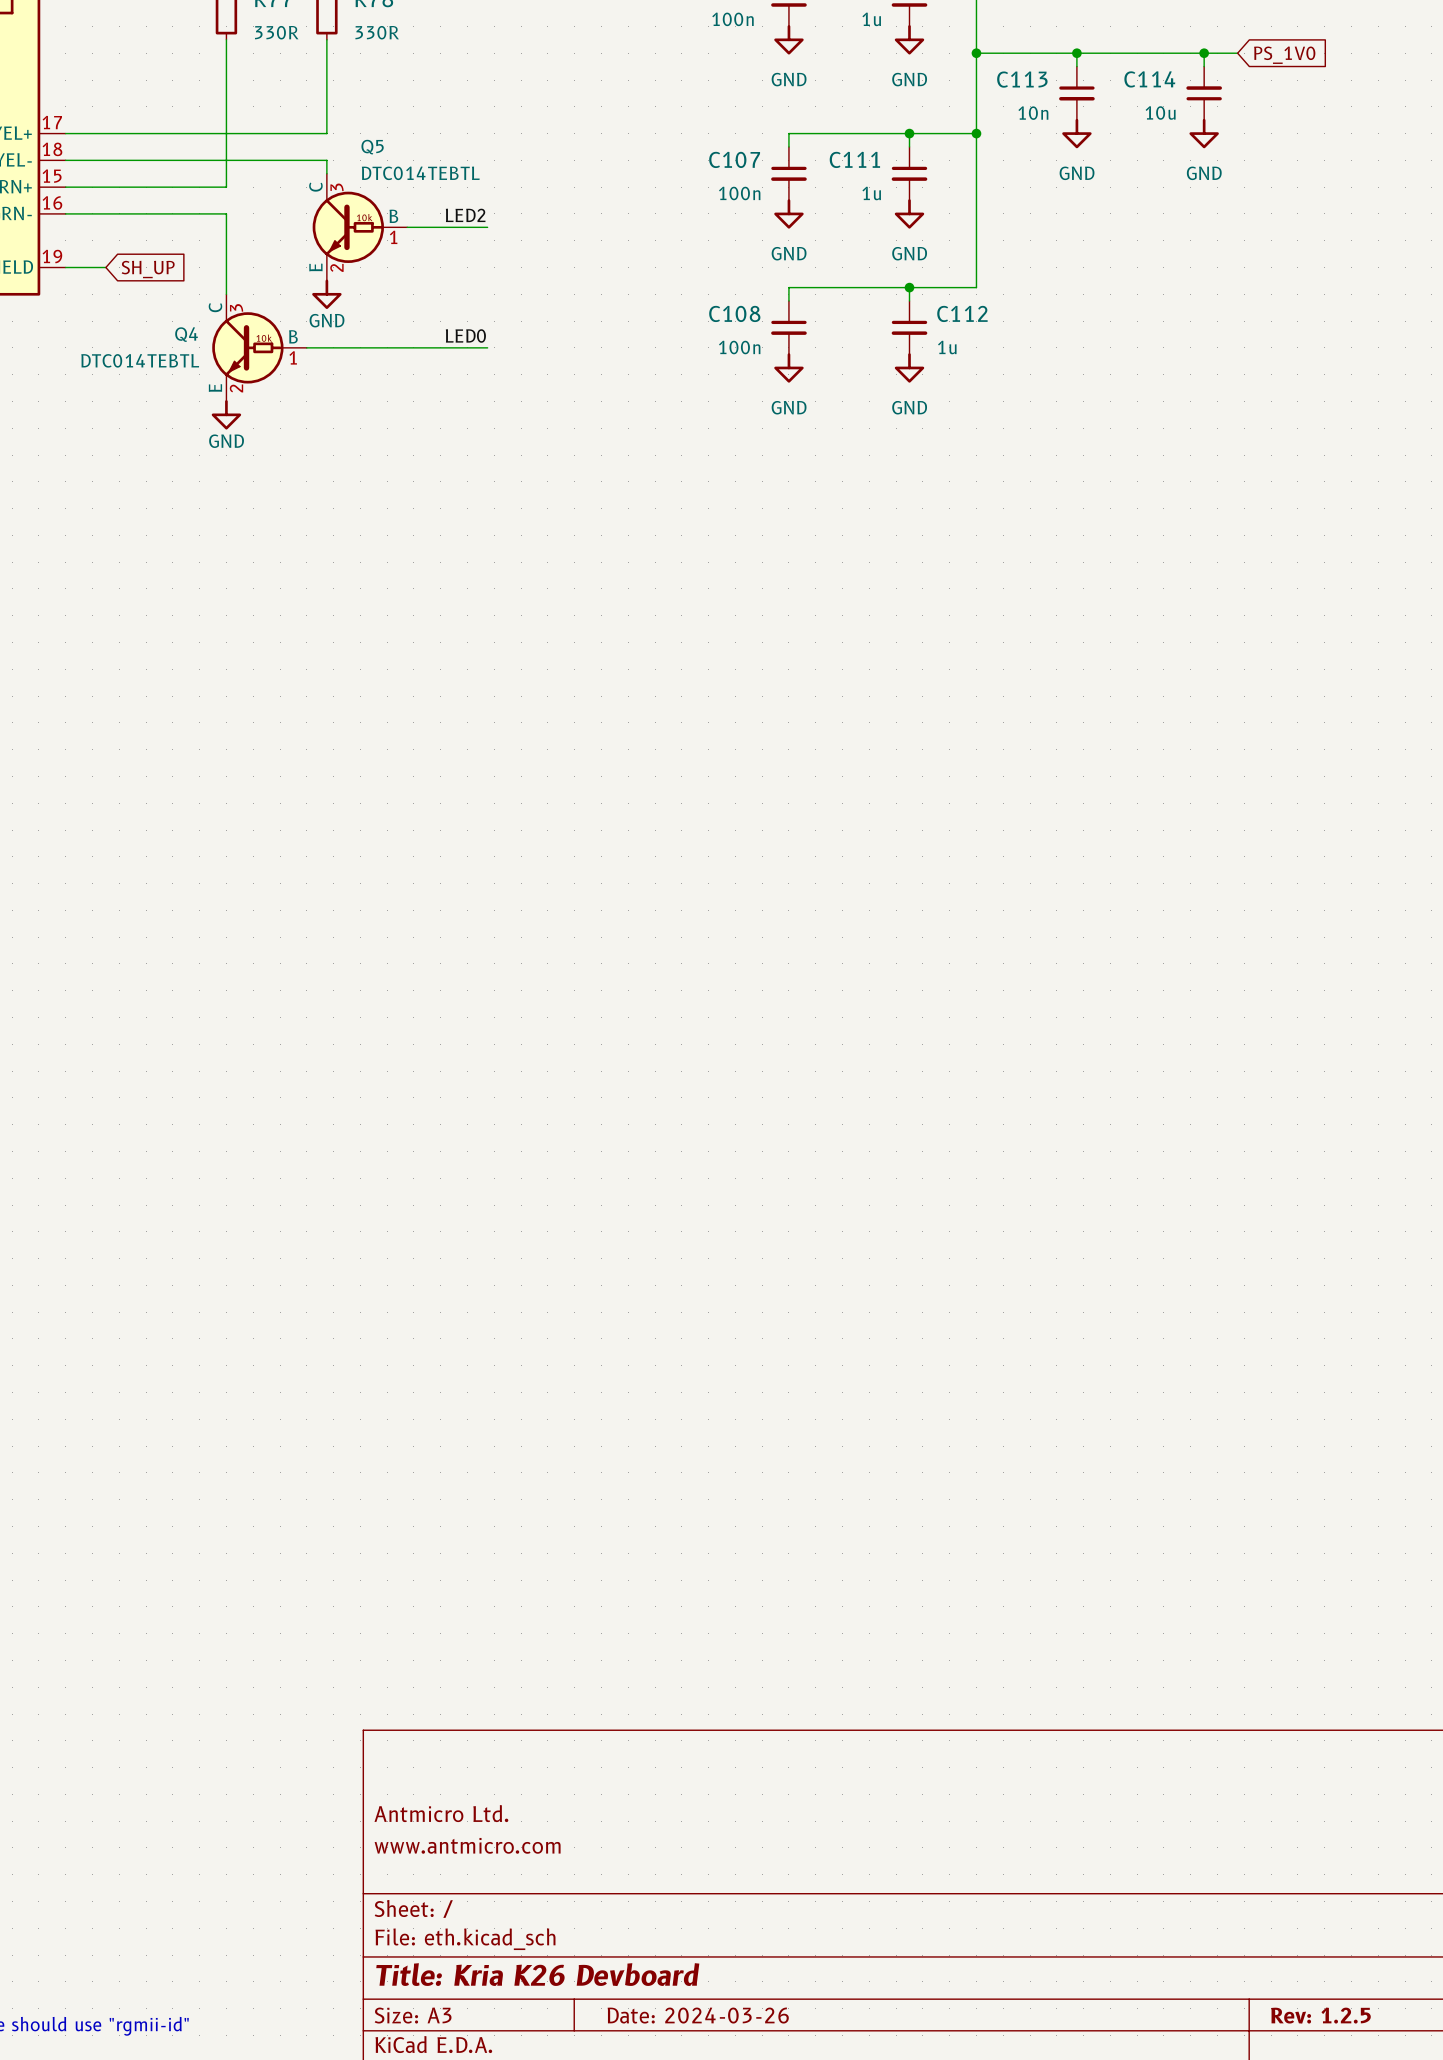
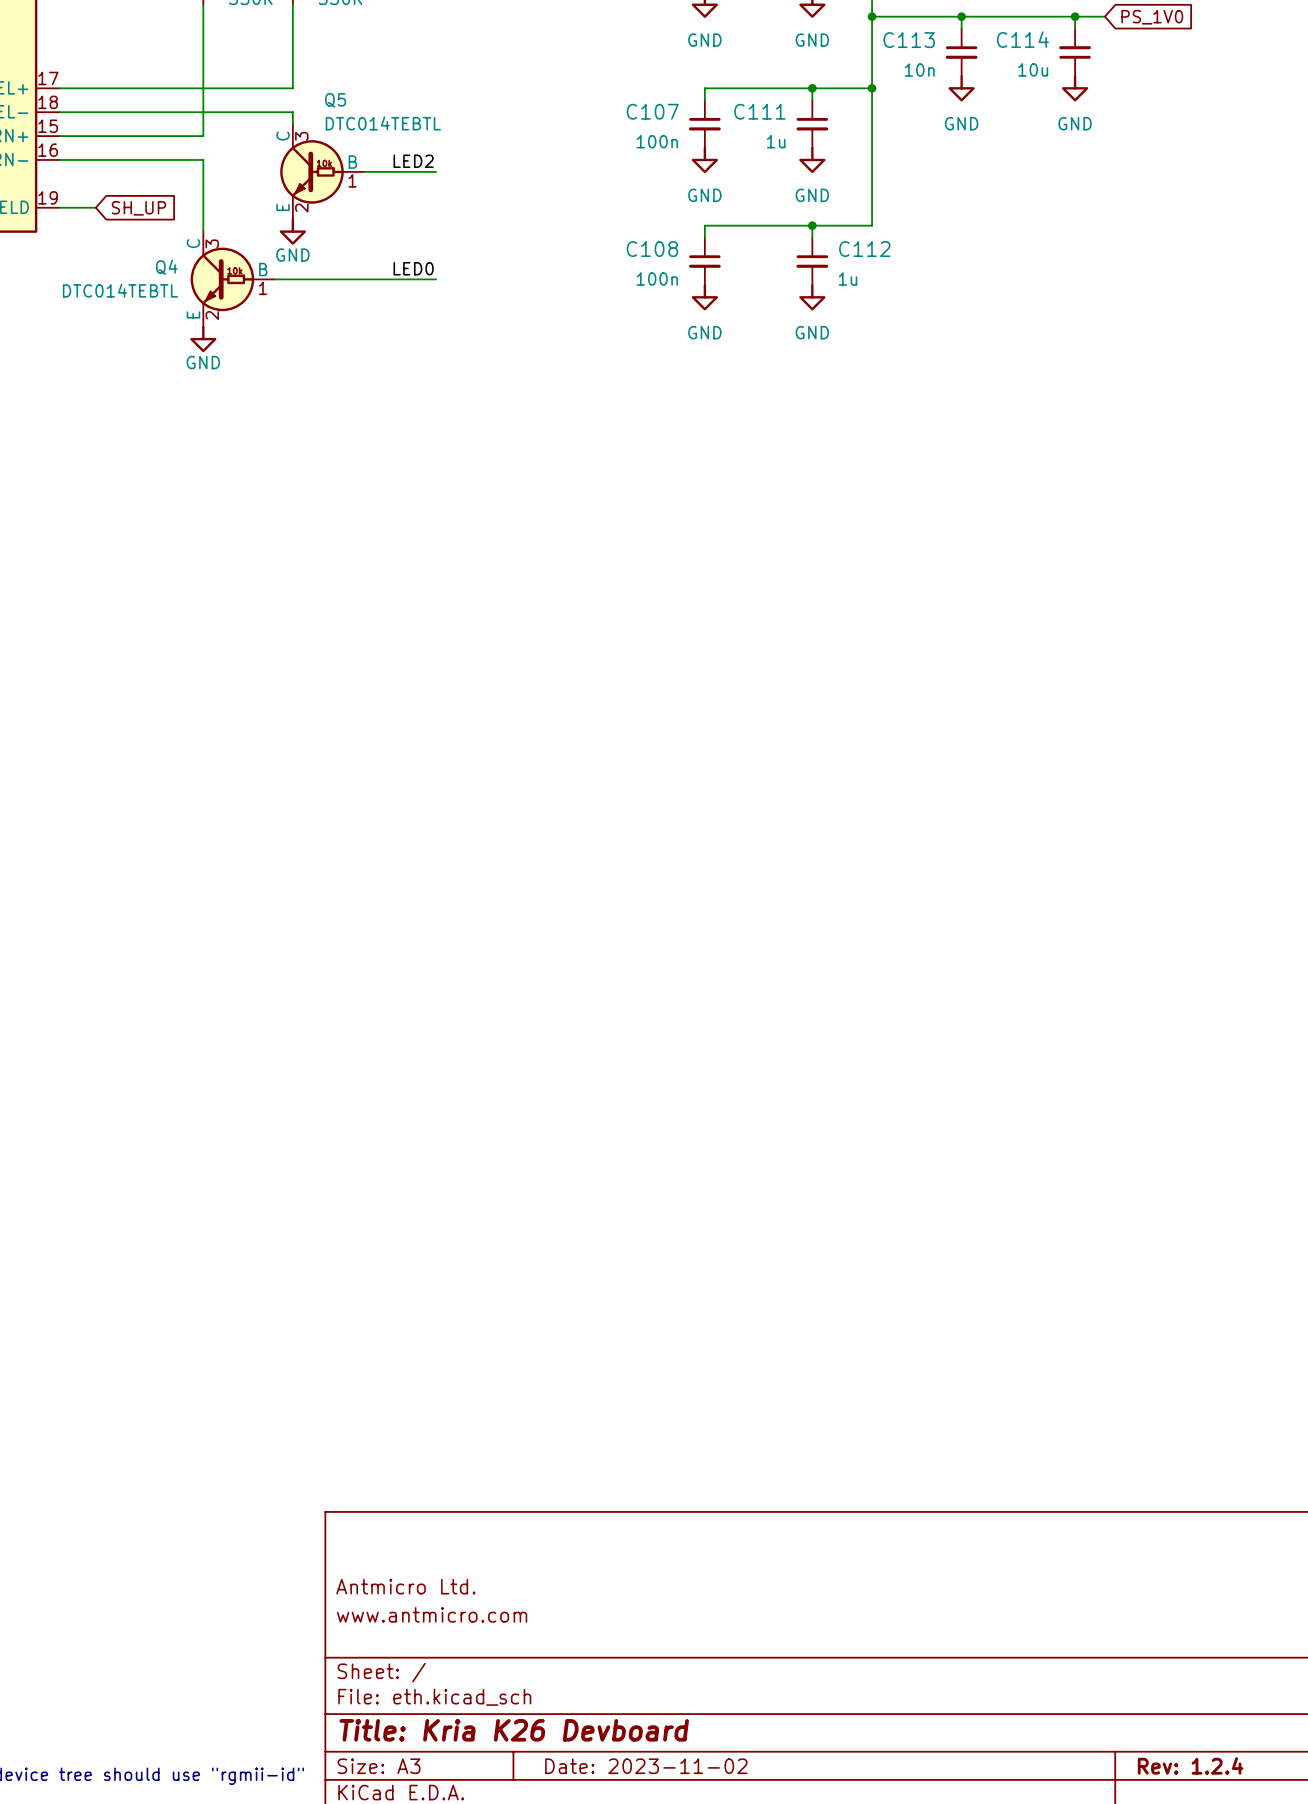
title block: Date: 2024-03-26 (698, 2015) -> Date: 2023-11-02 (646, 1766)
title block: Rev: 1.2.5 (1320, 2015) -> Rev: 1.2.4 (1190, 1765)

